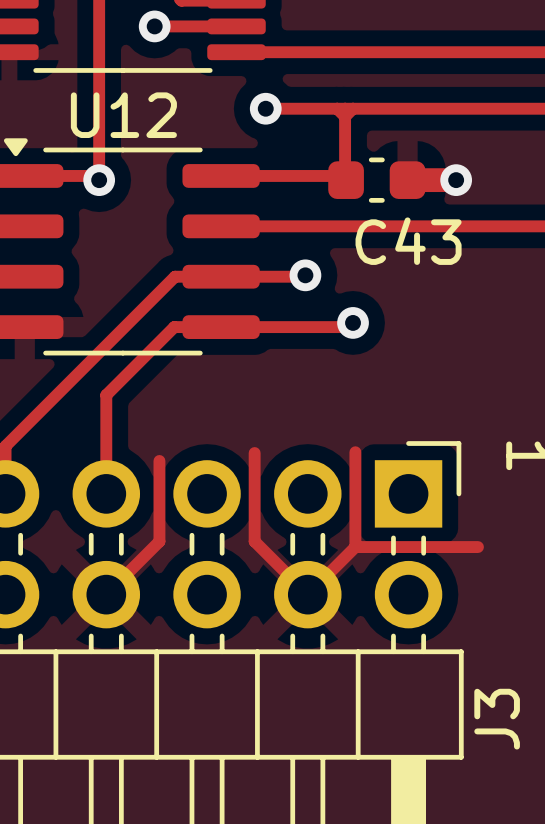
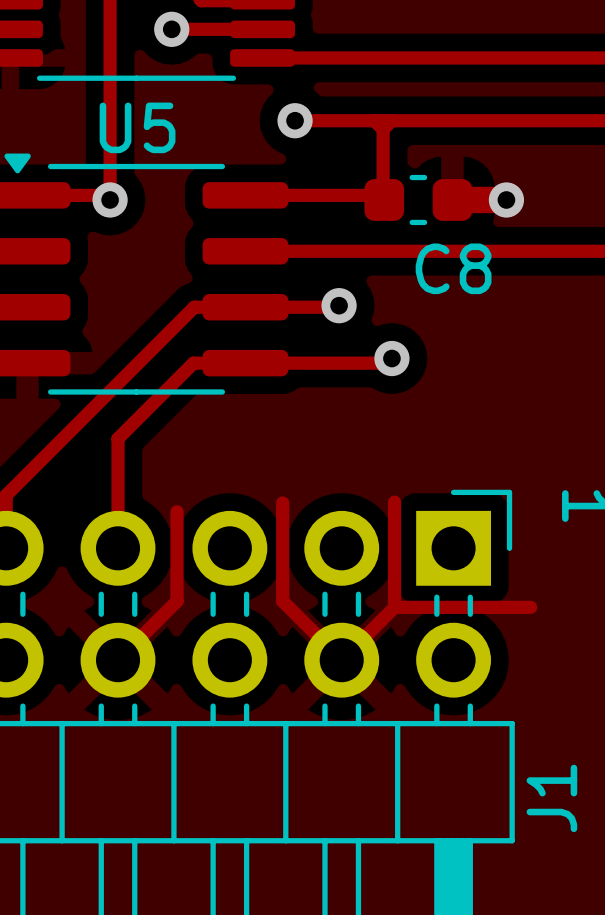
U12 name: U12 (123, 115) -> U5 (137, 127)
C43 name: C43 (408, 241) -> C8 (453, 268)
J3 name: J3 (497, 719) -> J1 (551, 798)

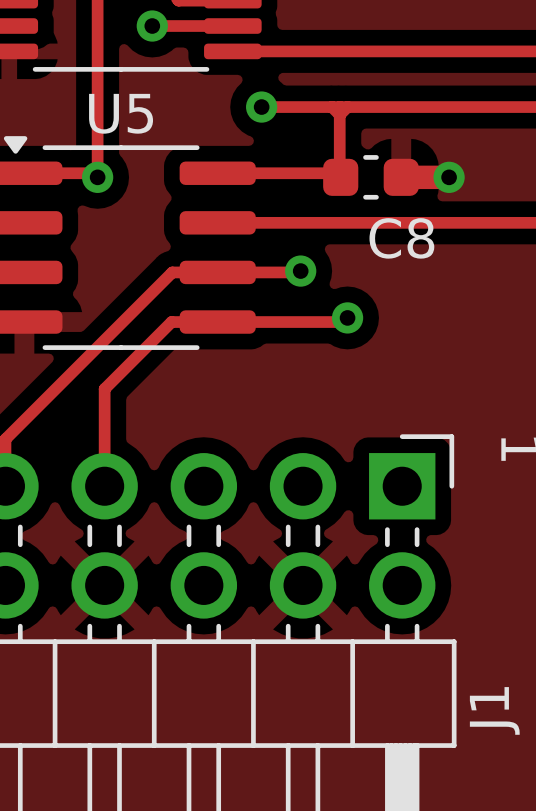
track: (282, 502) (282, 601) (341, 660) (394, 607) -> none
track: (394, 502) (394, 607) -> none
track: (177, 511) (177, 601) (118, 660) -> none
track: (394, 607) (530, 607) -> none

